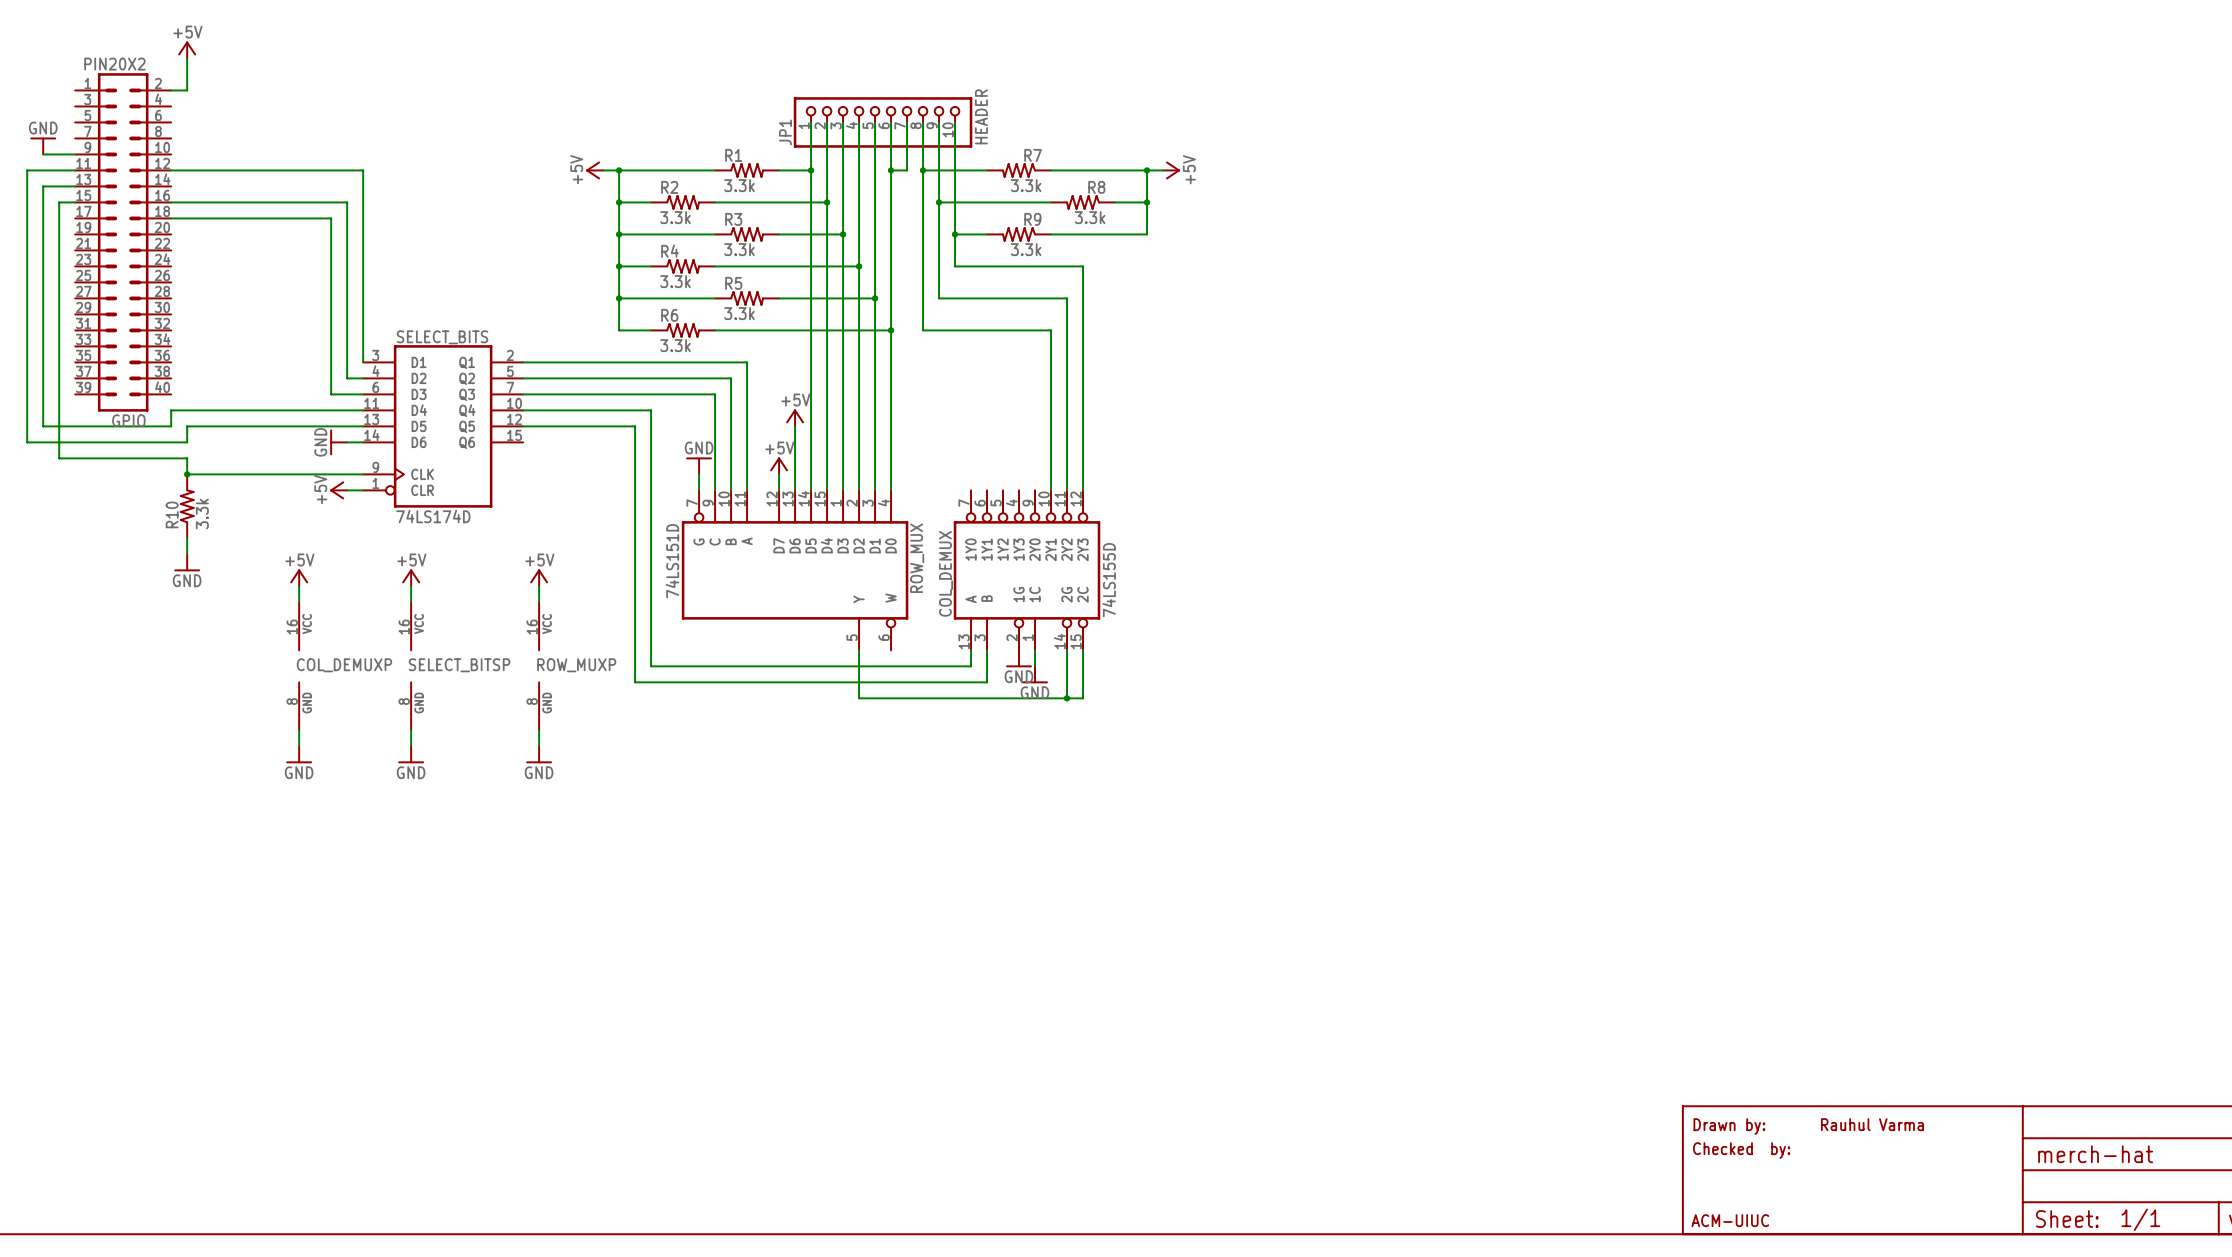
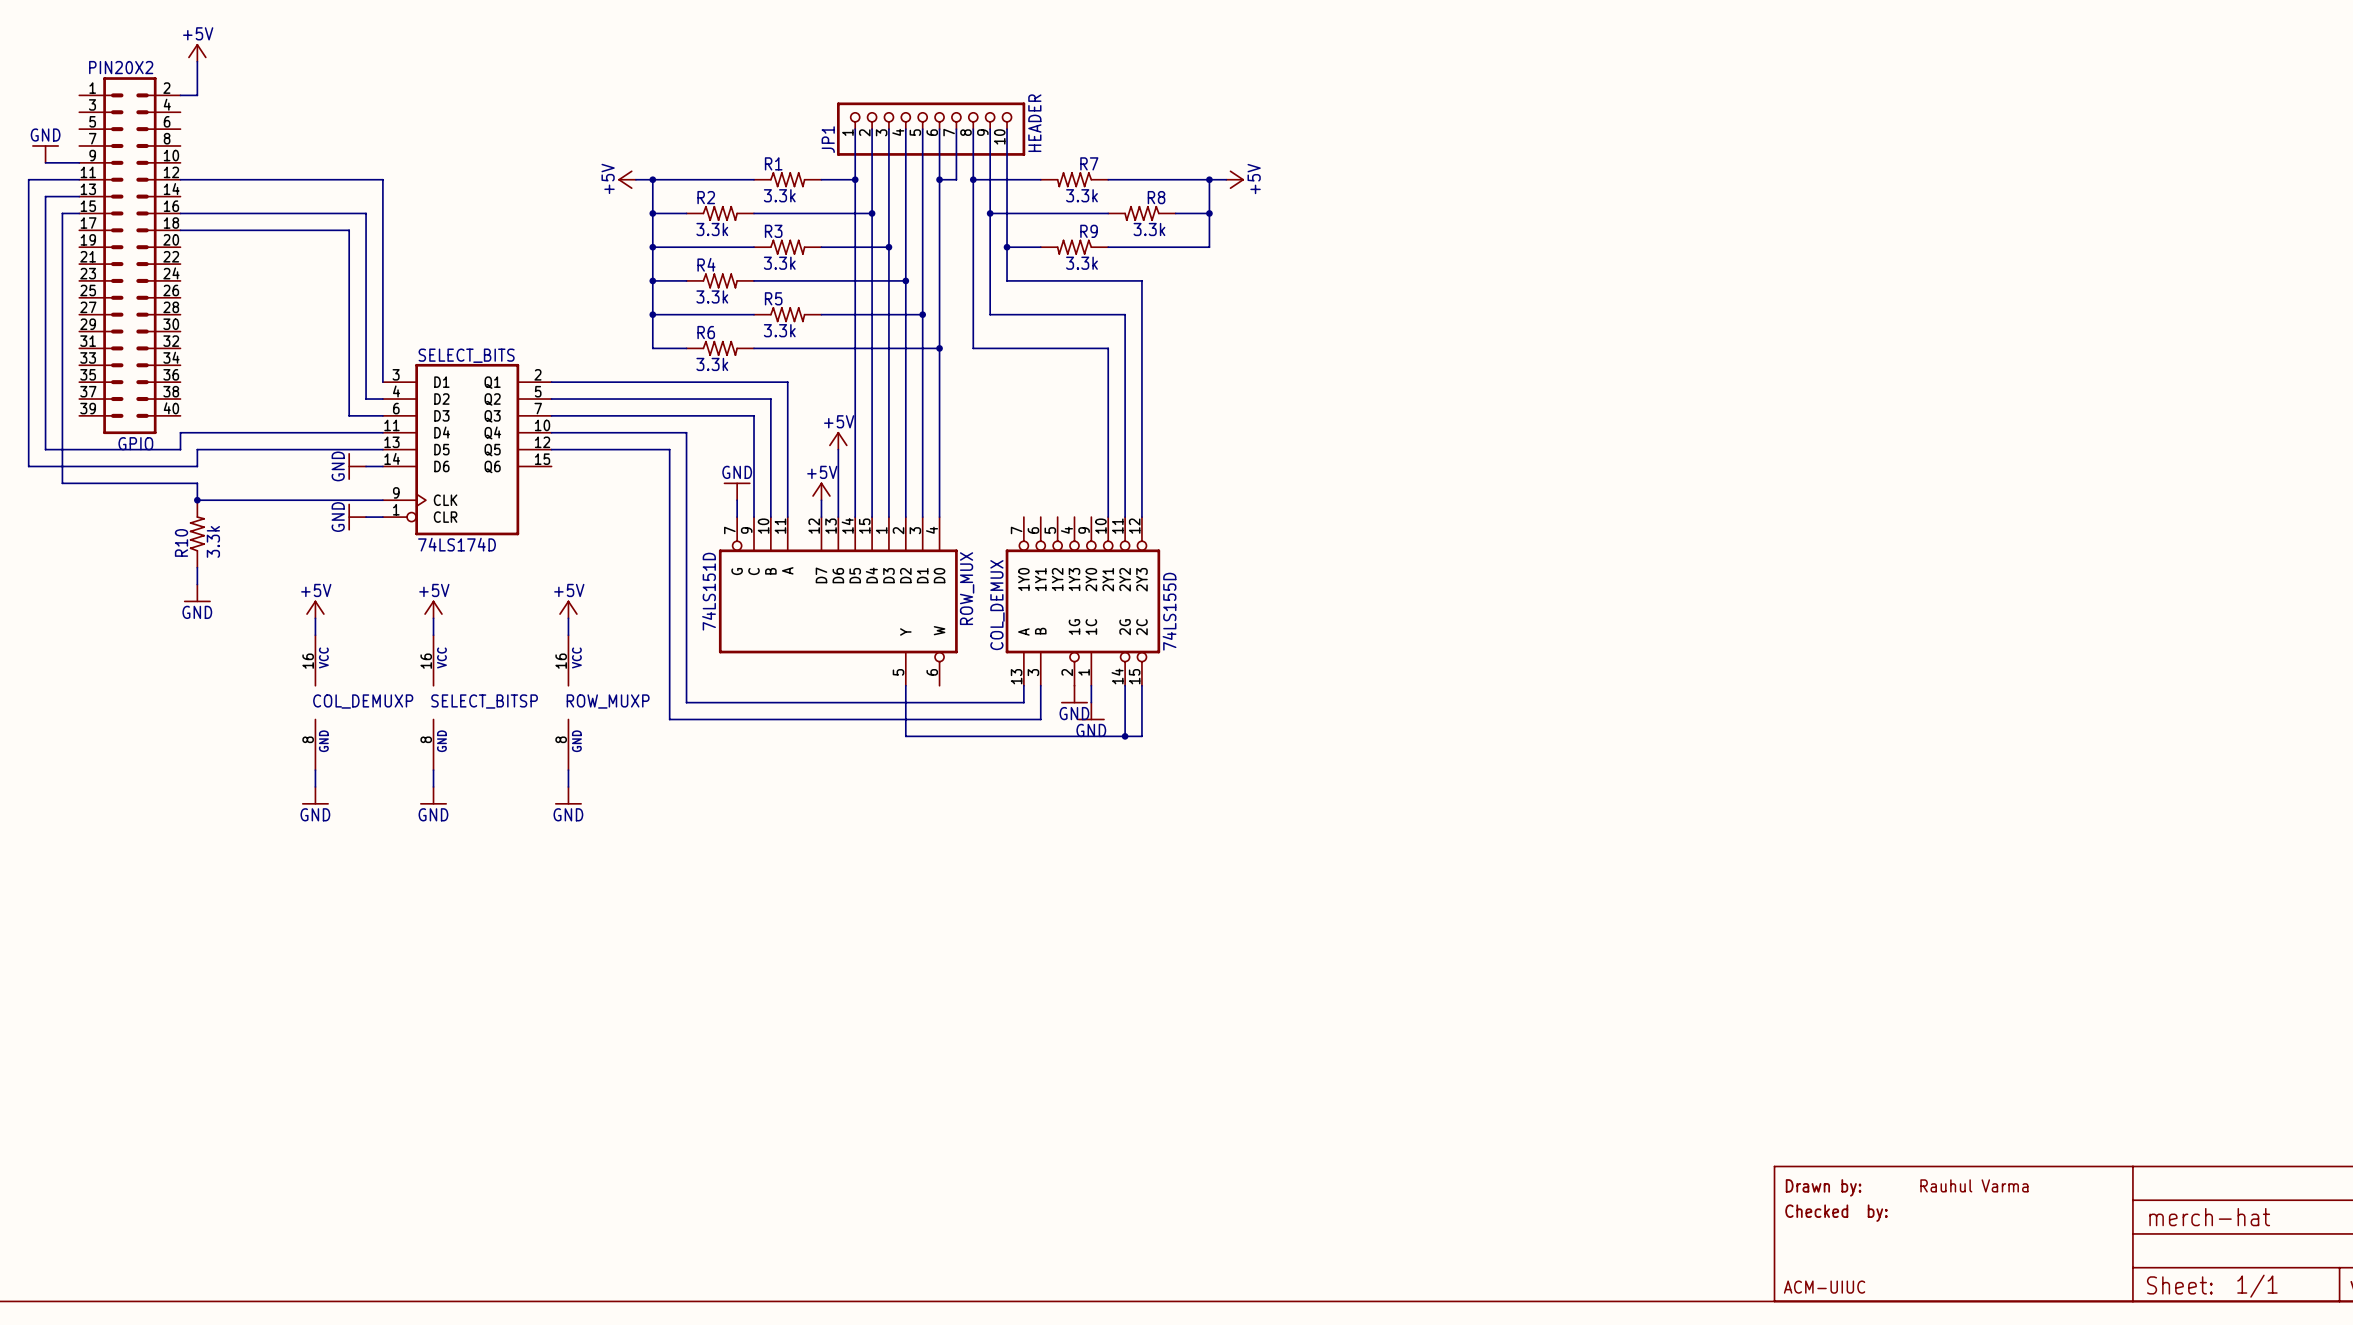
power symbol: +5V (338, 490) -> GND (357, 517)

